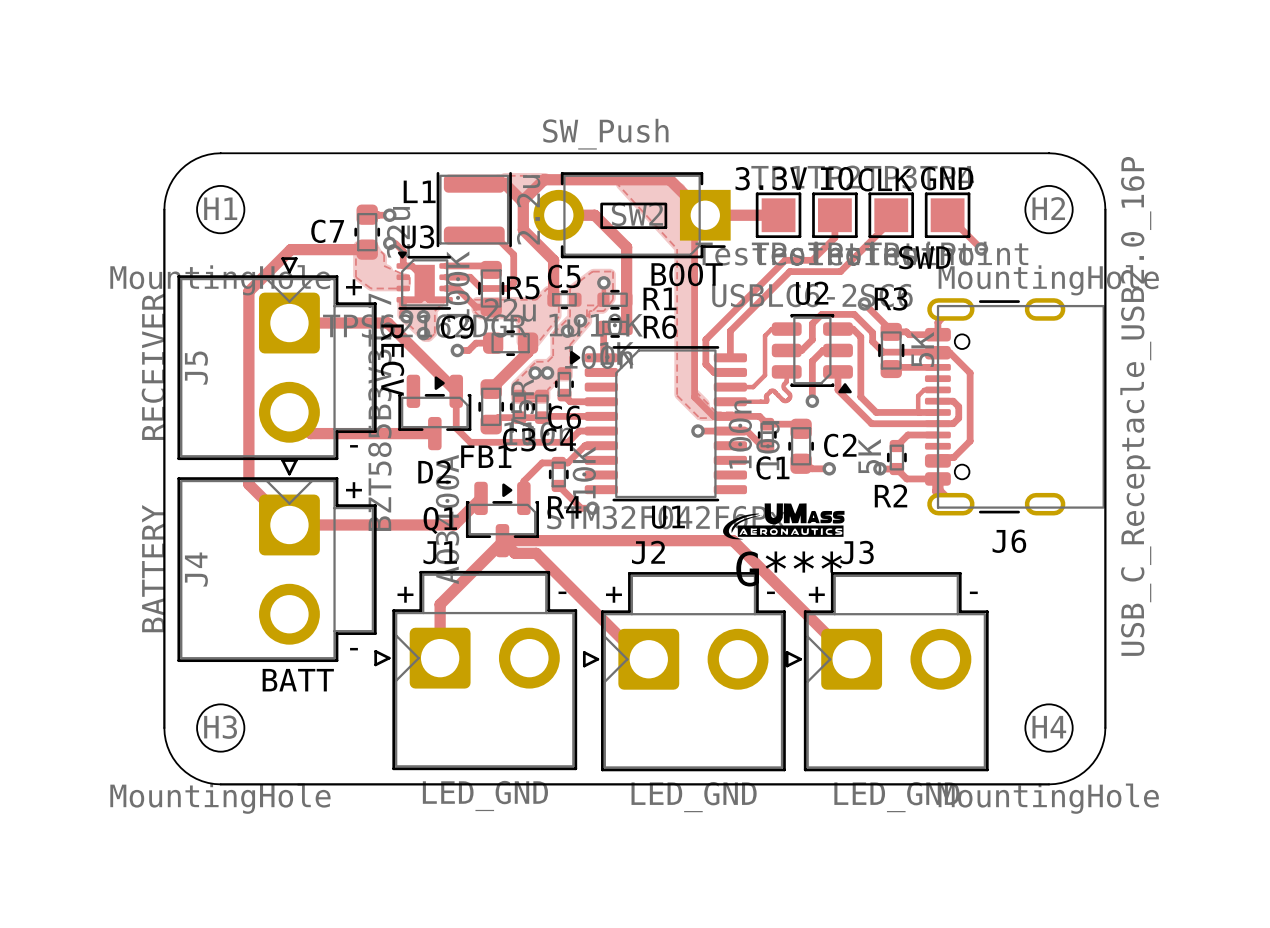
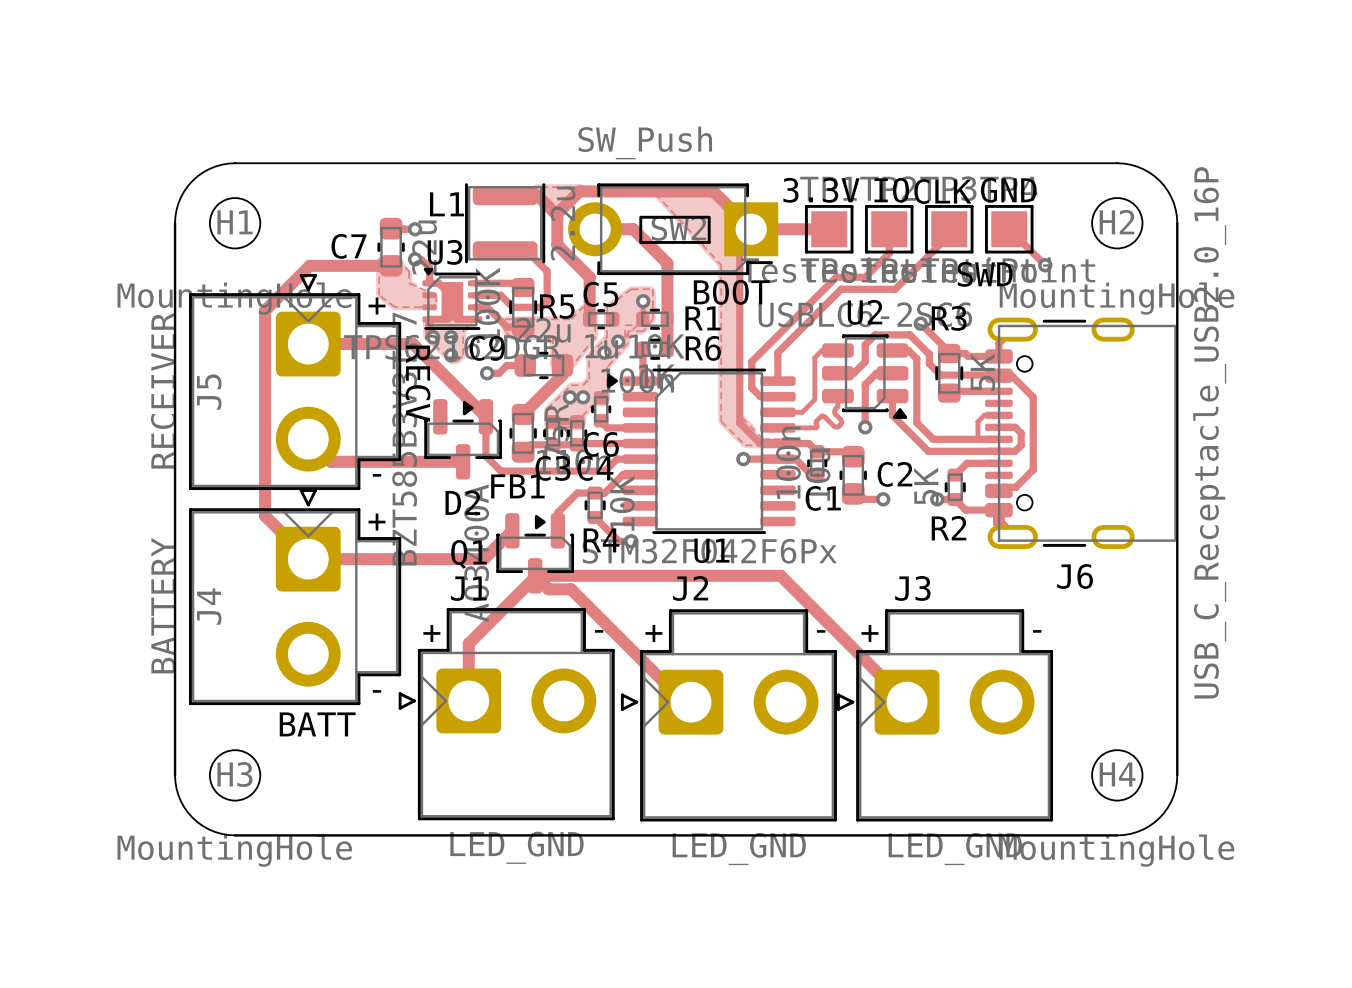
G***: (783, 521) -> none

